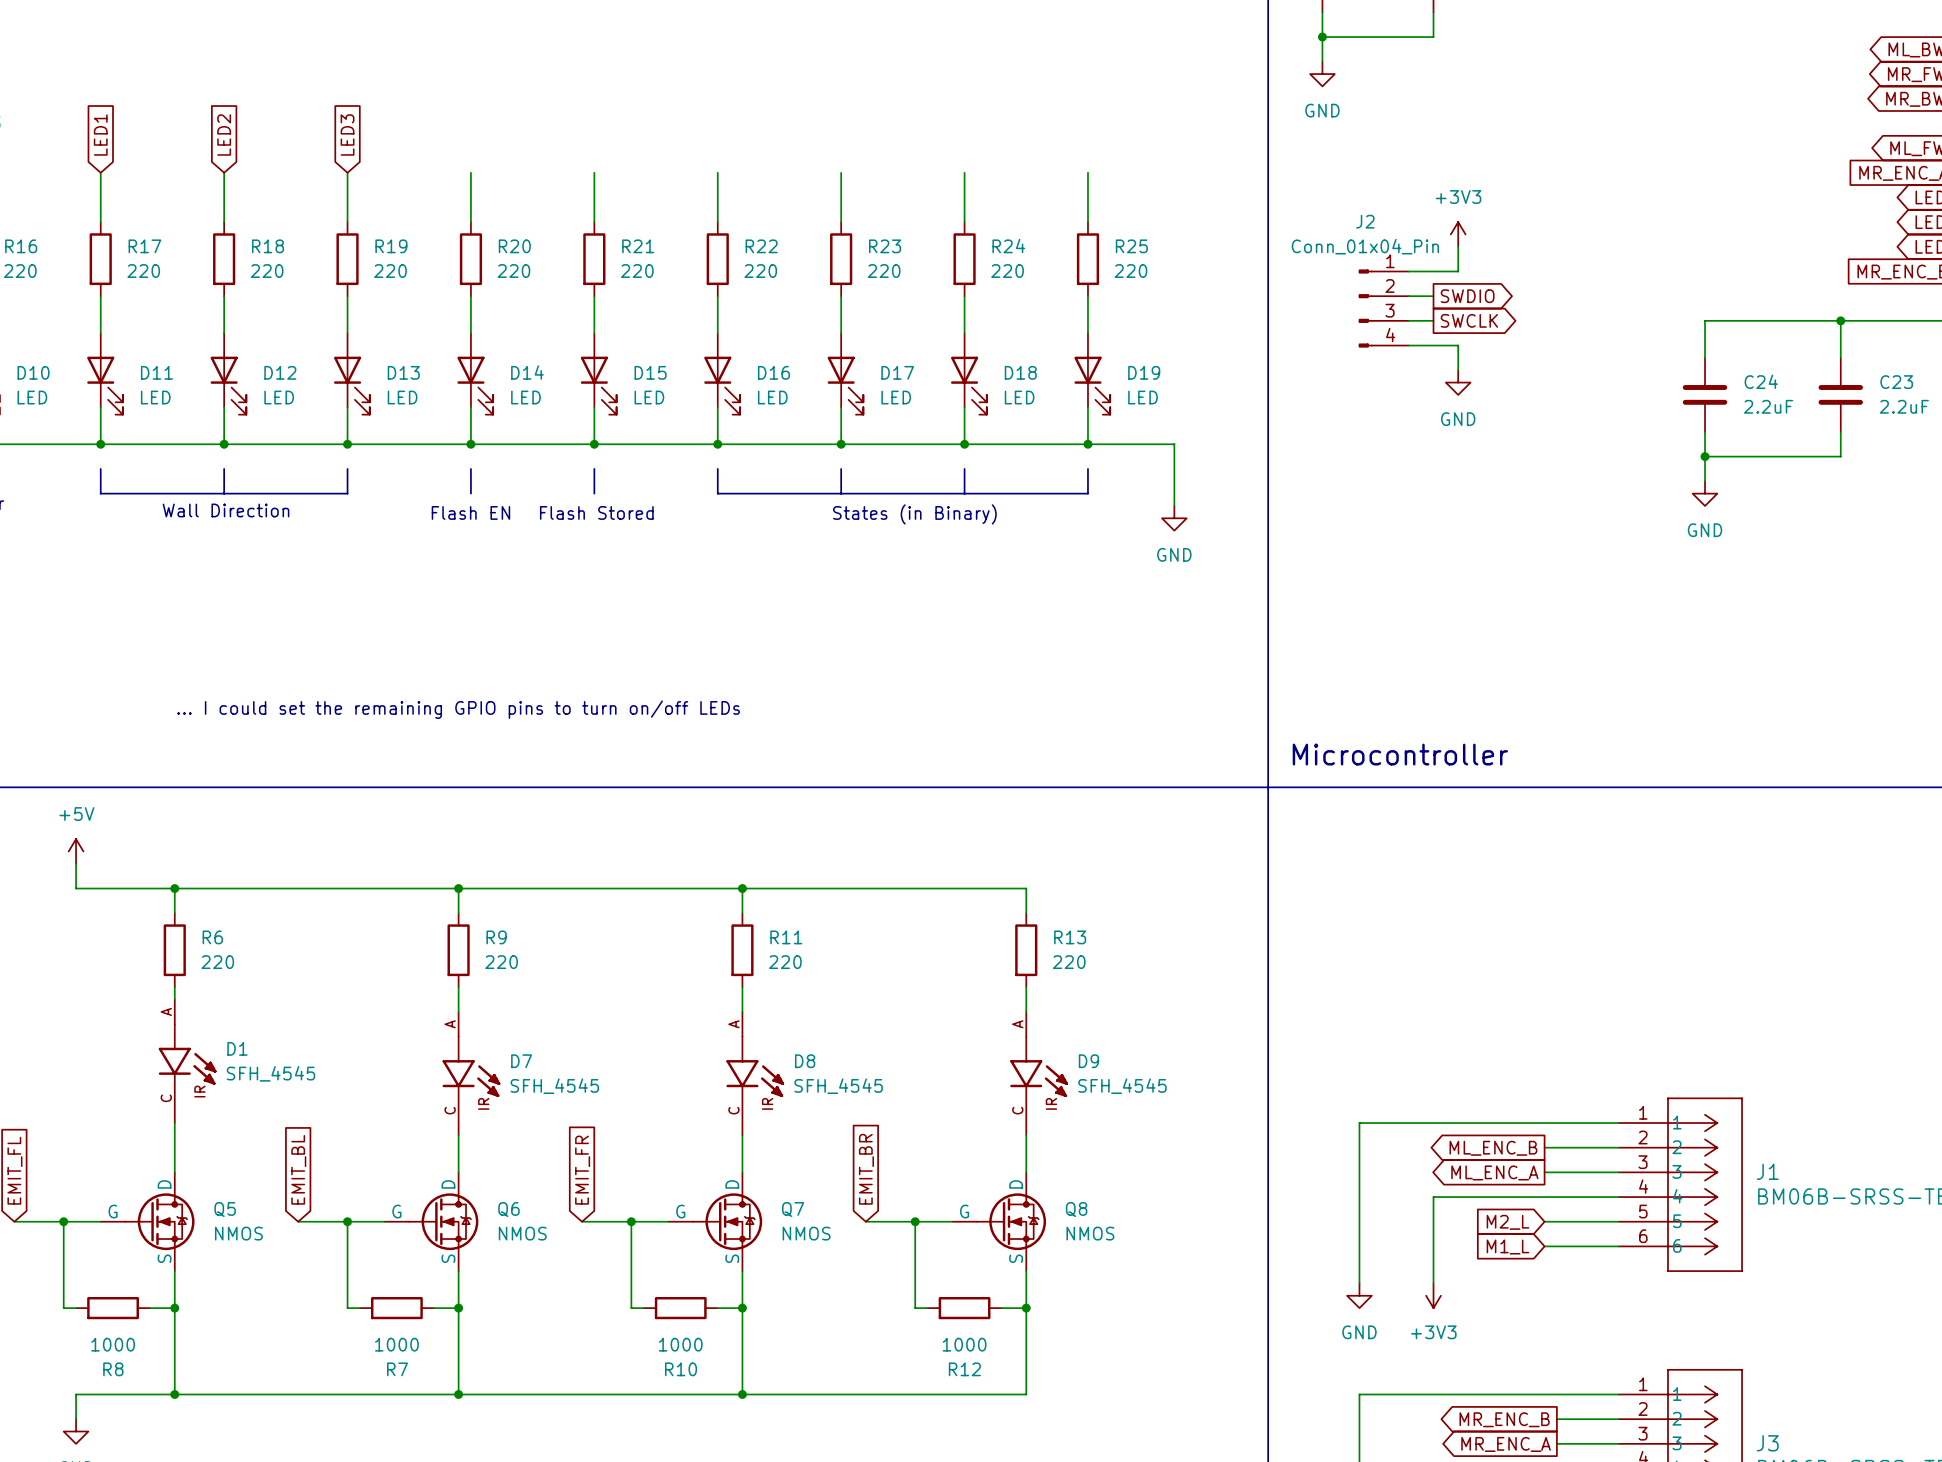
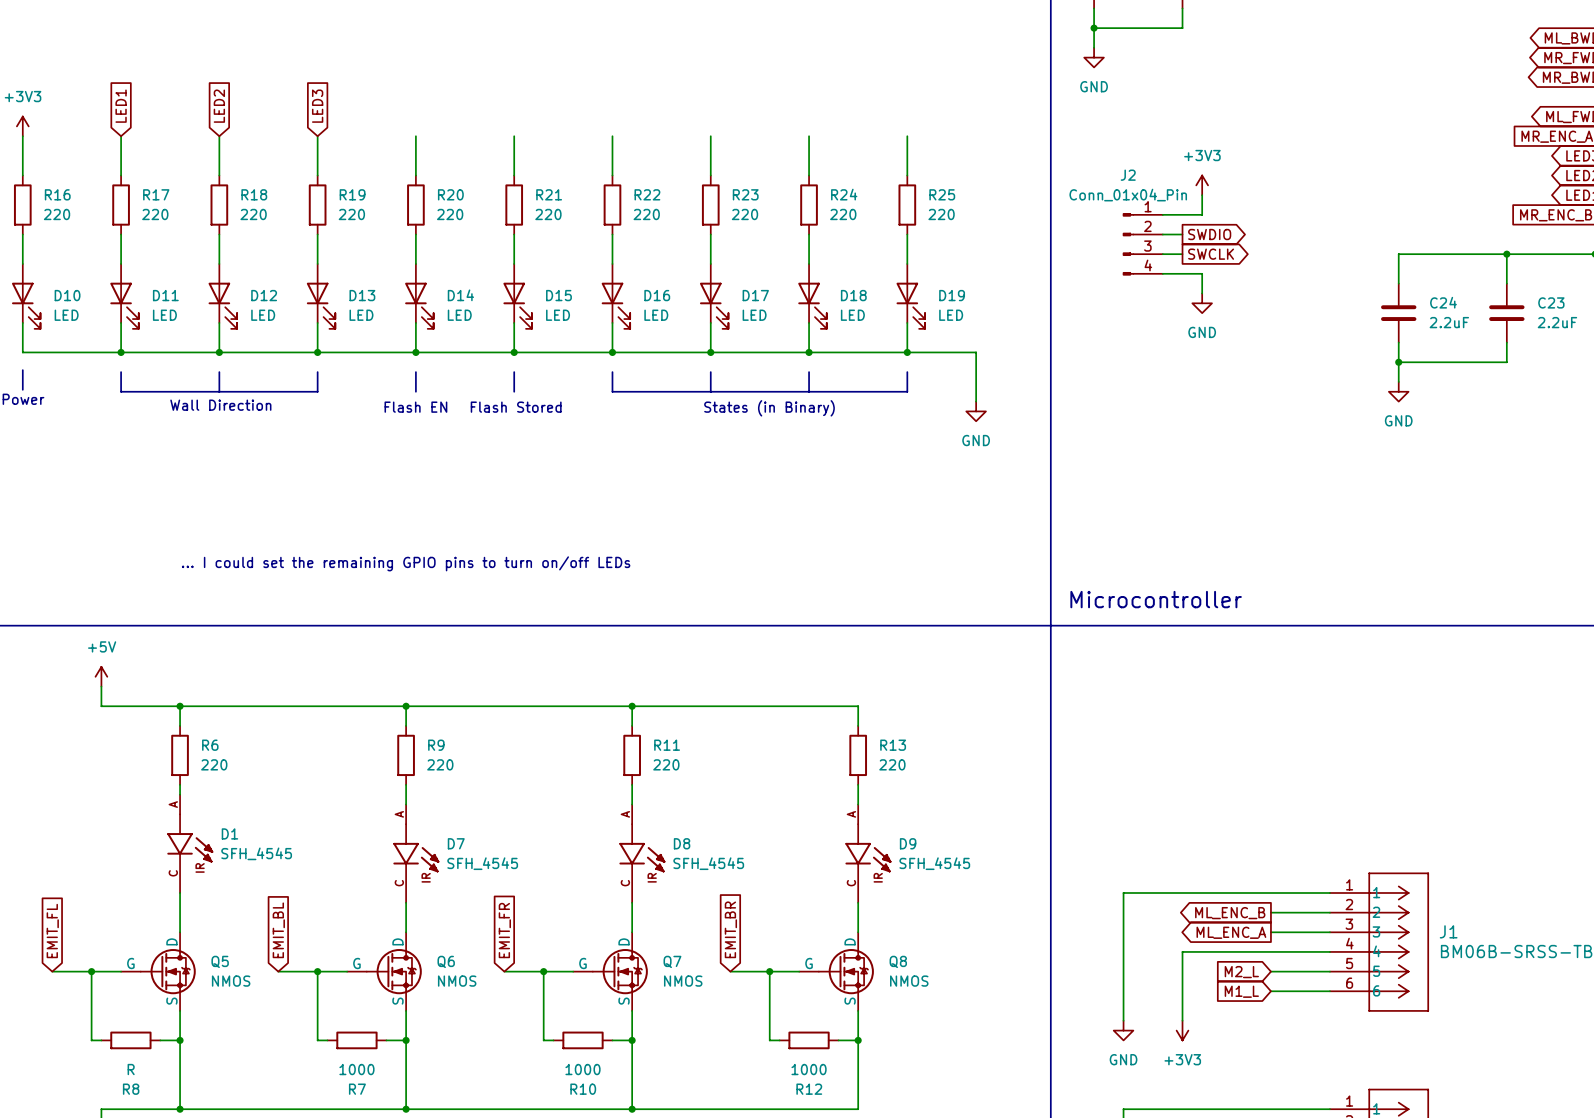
R8 value: 1000 (113, 1344) -> R (131, 1069)

